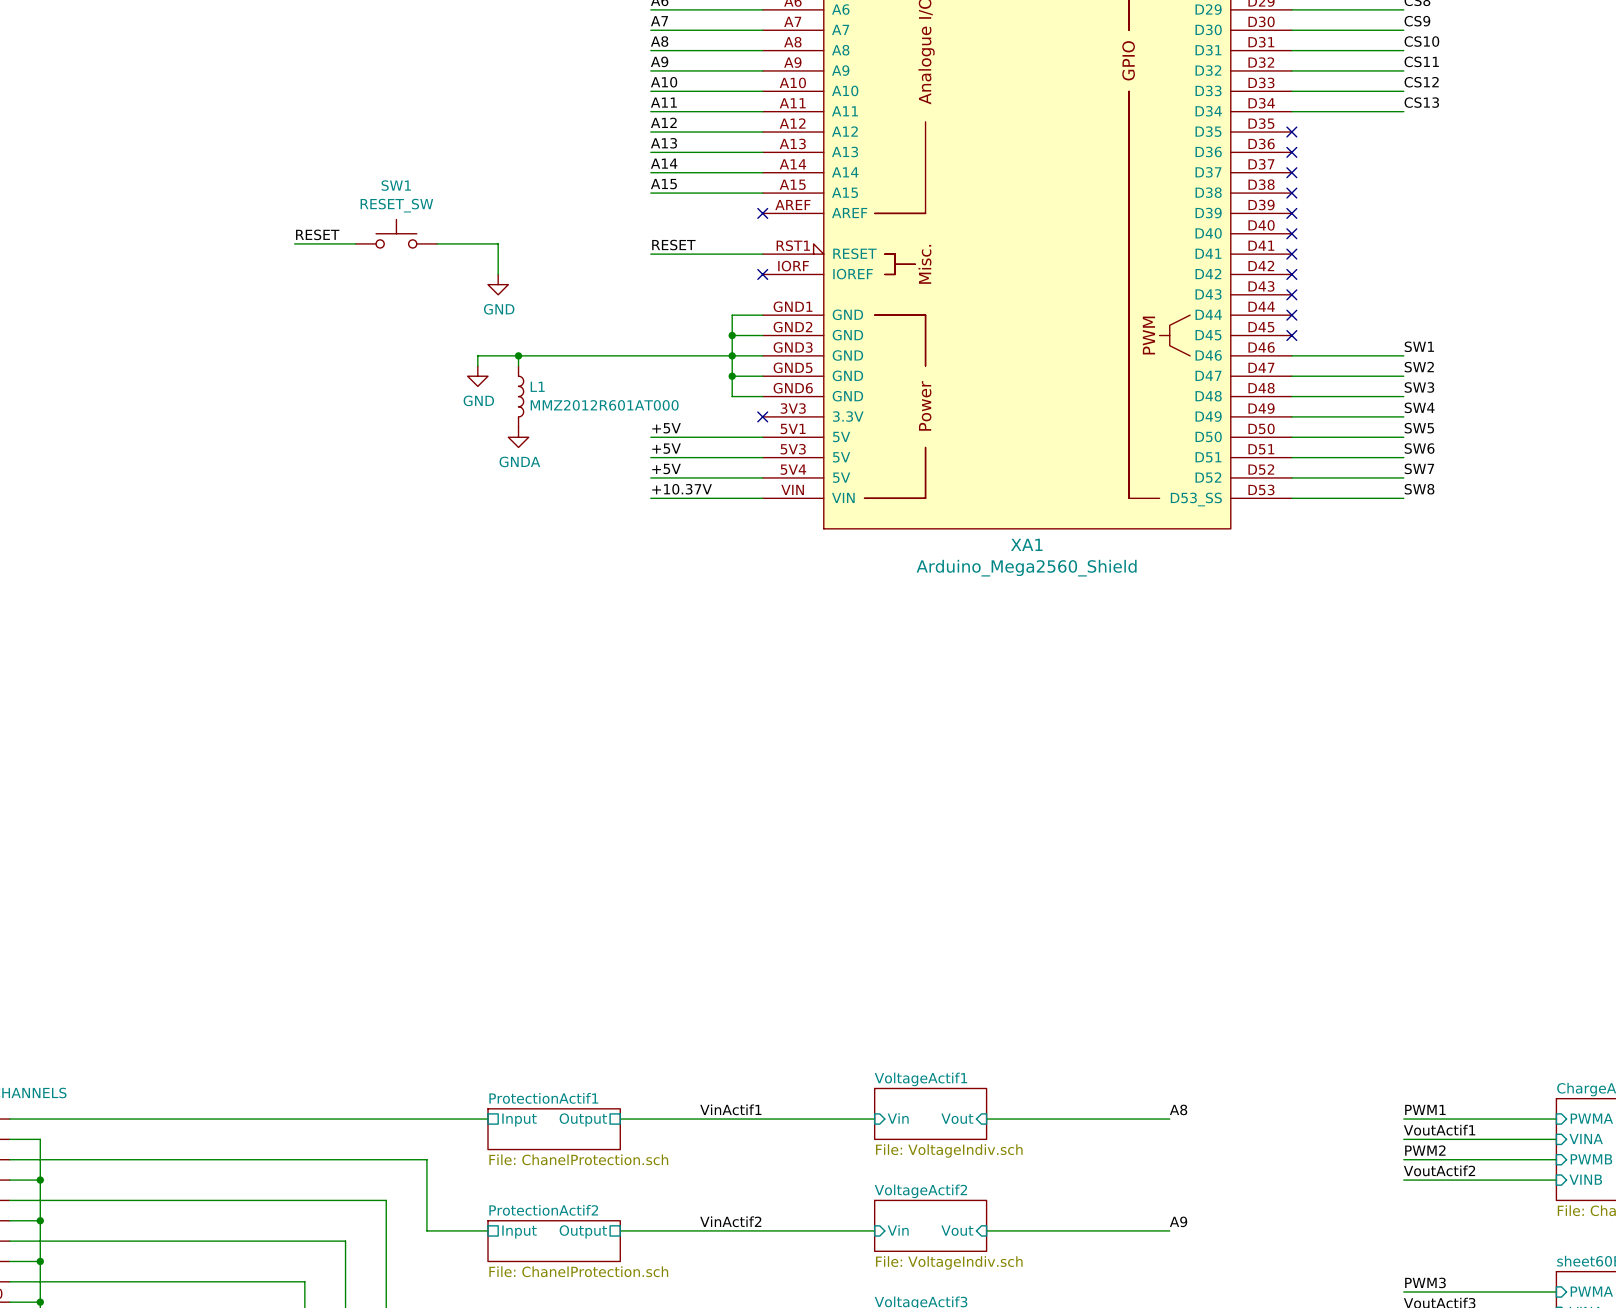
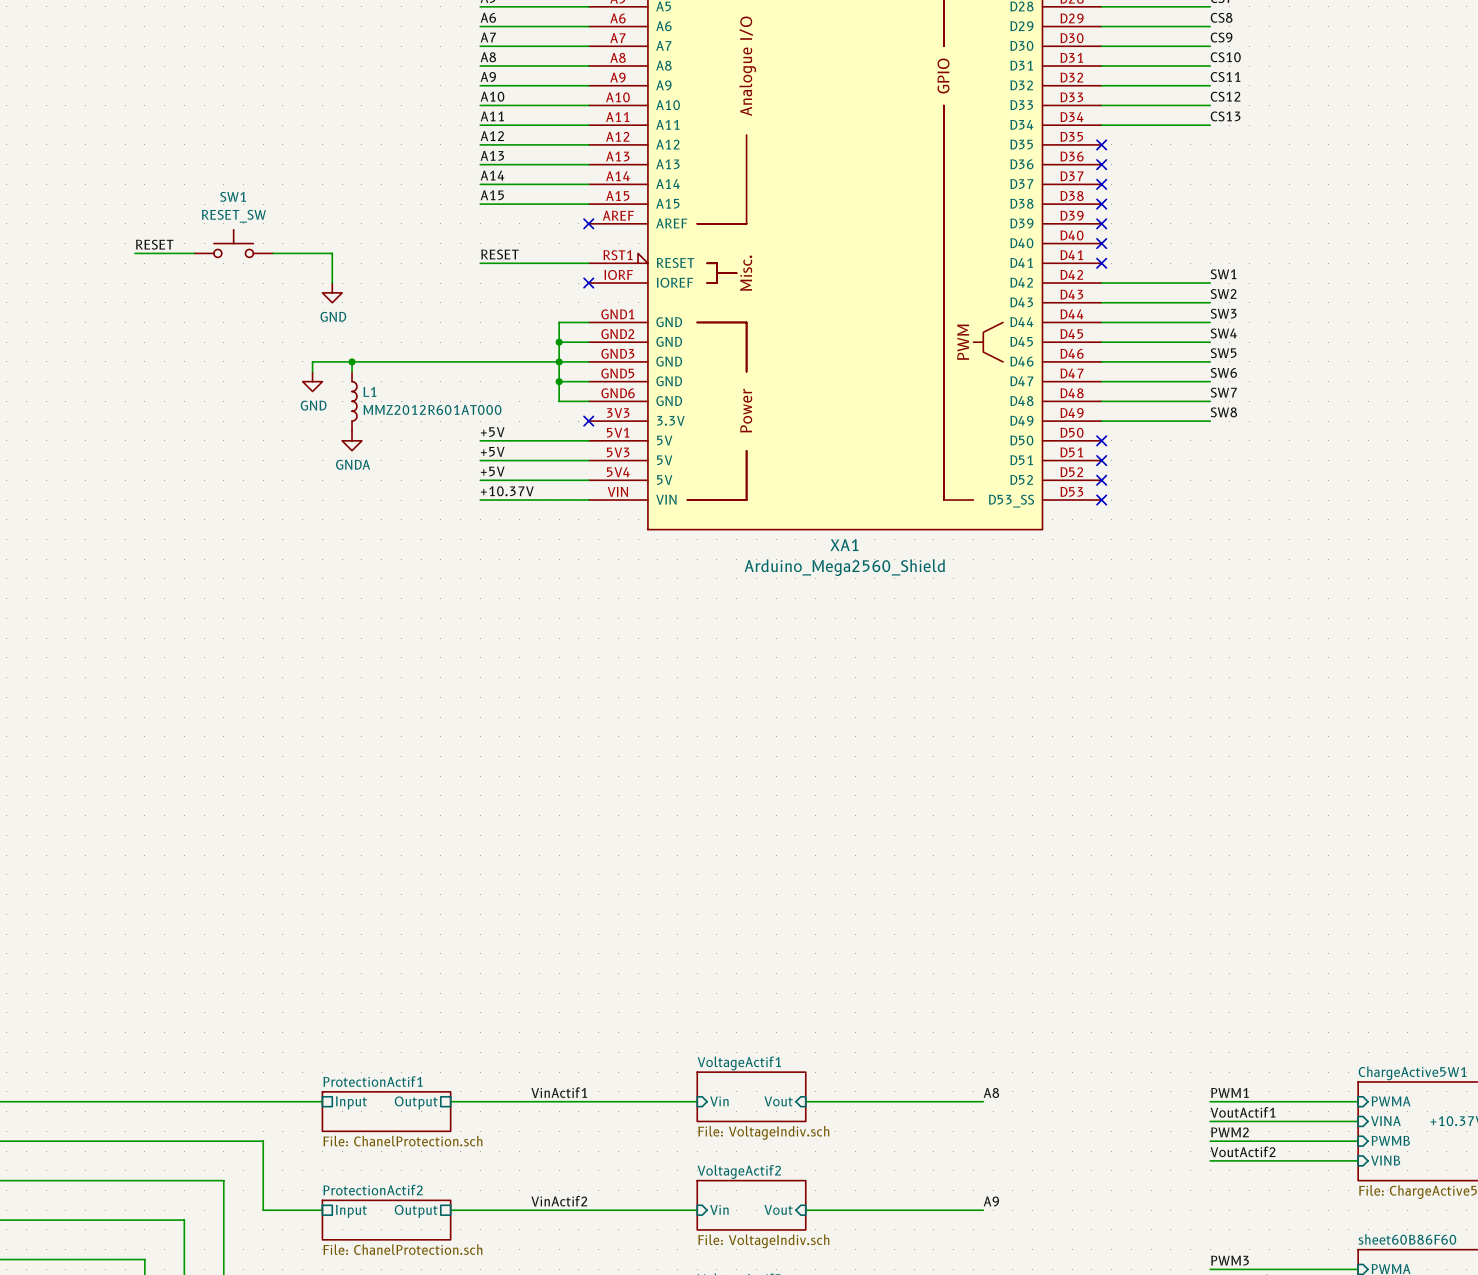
label: none -> SW1 (1223, 274)
no-connect mark: (1291, 274) -> none
label: none -> SW2 (1223, 293)
no-connect mark: (1291, 294) -> none
label: none -> SW3 (1223, 313)
no-connect mark: (1291, 315) -> none
label: none -> SW4 (1223, 333)
no-connect mark: (1291, 335) -> none
label: SW1 (1419, 346) -> SW5 (1223, 353)
label: SW2 (1419, 367) -> SW6 (1223, 372)
label: SW3 (1419, 387) -> SW7 (1223, 392)
label: SW4 (1419, 407) -> SW8 (1223, 412)
label: SW5 (1419, 428) -> none
wire: (1291, 437) (1403, 437) -> (1101, 283) (1210, 283)
no-connect mark: none -> (1101, 440)
label: SW6 (1419, 448) -> none
wire: (1291, 457) (1403, 457) -> (1101, 302) (1210, 302)
no-connect mark: none -> (1101, 460)
label: SW7 (1419, 468) -> none
wire: (1291, 477) (1403, 477) -> (1101, 322) (1210, 322)
no-connect mark: none -> (1101, 480)
label: SW8 (1419, 489) -> none
wire: (1291, 498) (1403, 498) -> (1101, 342) (1210, 342)
no-connect mark: none -> (1101, 500)

